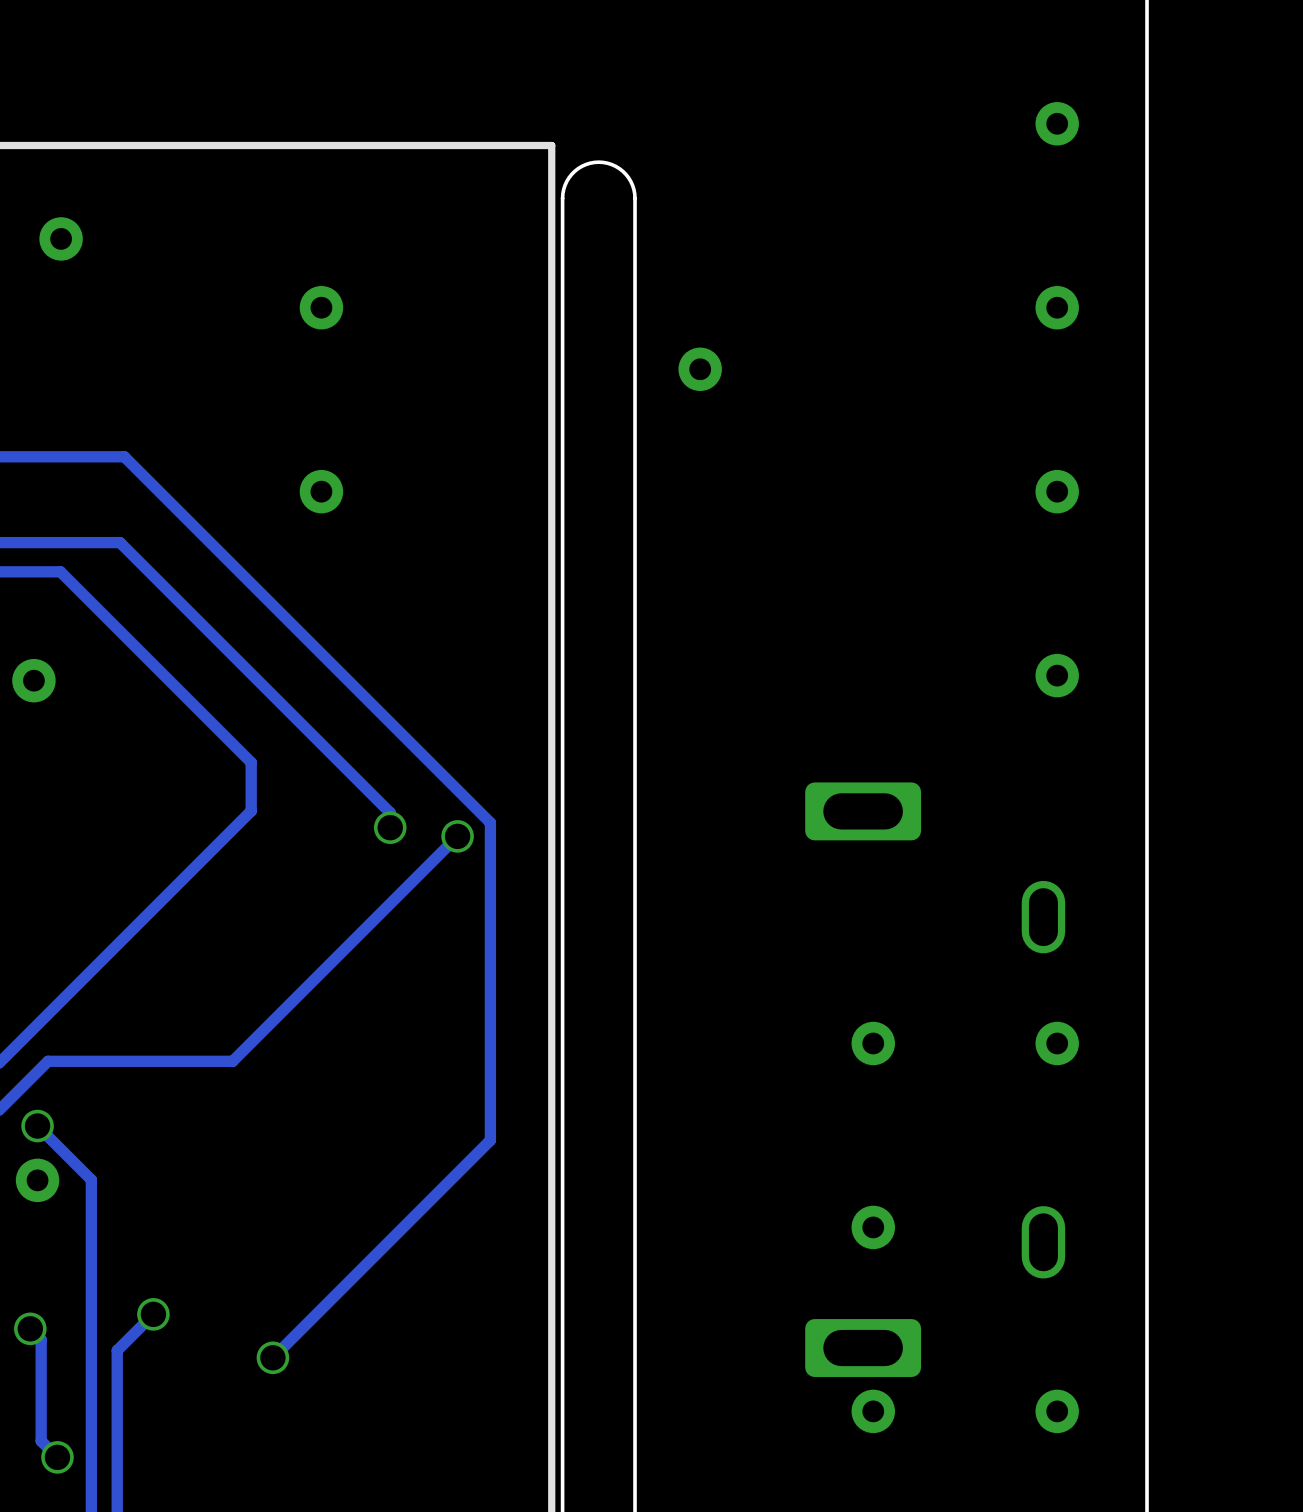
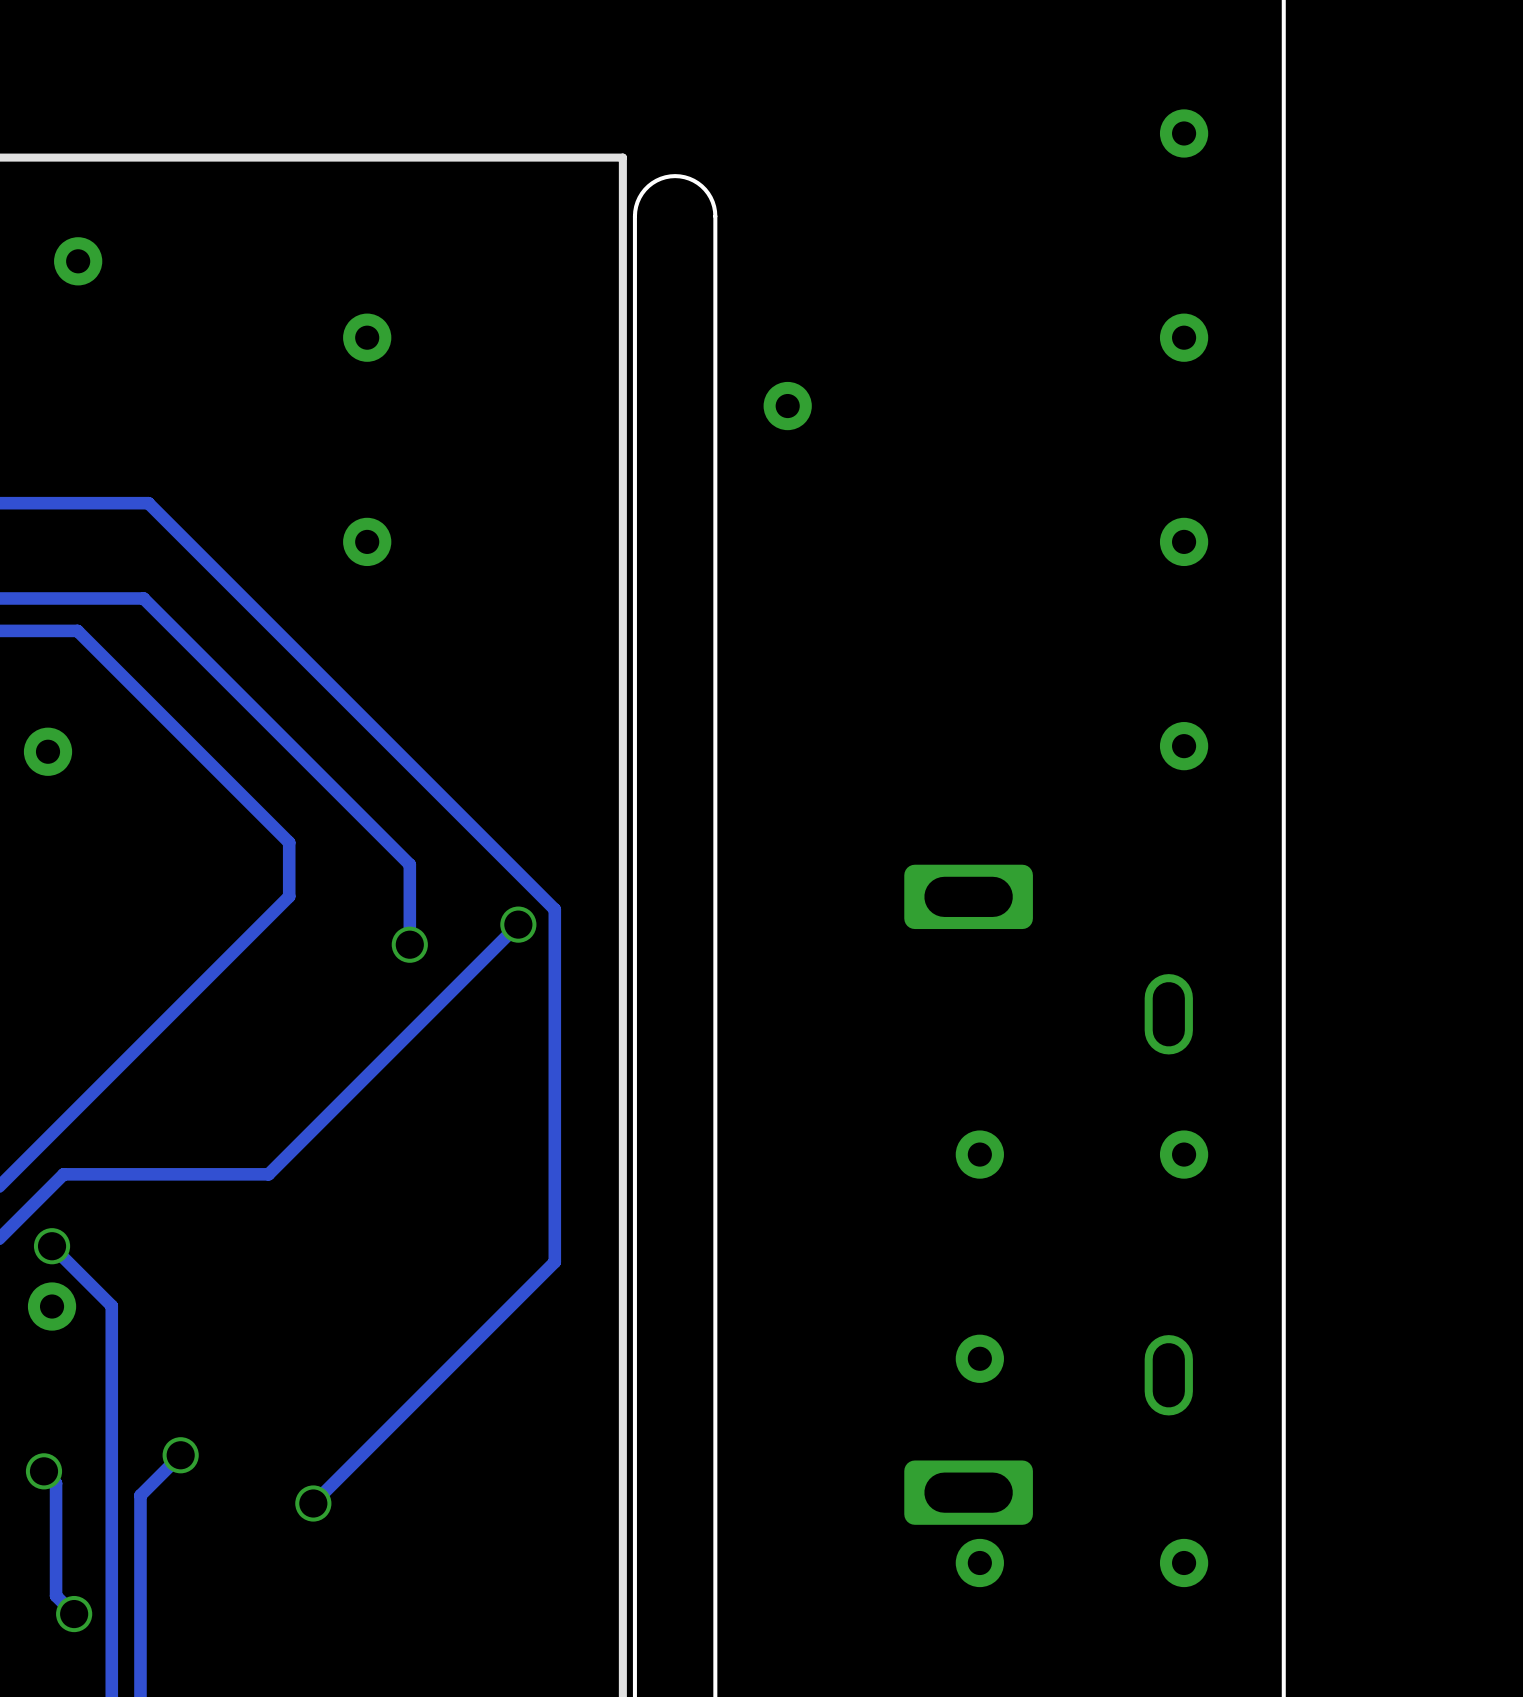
track: (359, 782) (390, 812) (390, 827) -> (409, 864) (409, 944)
via position: (390, 827) -> (409, 944)

